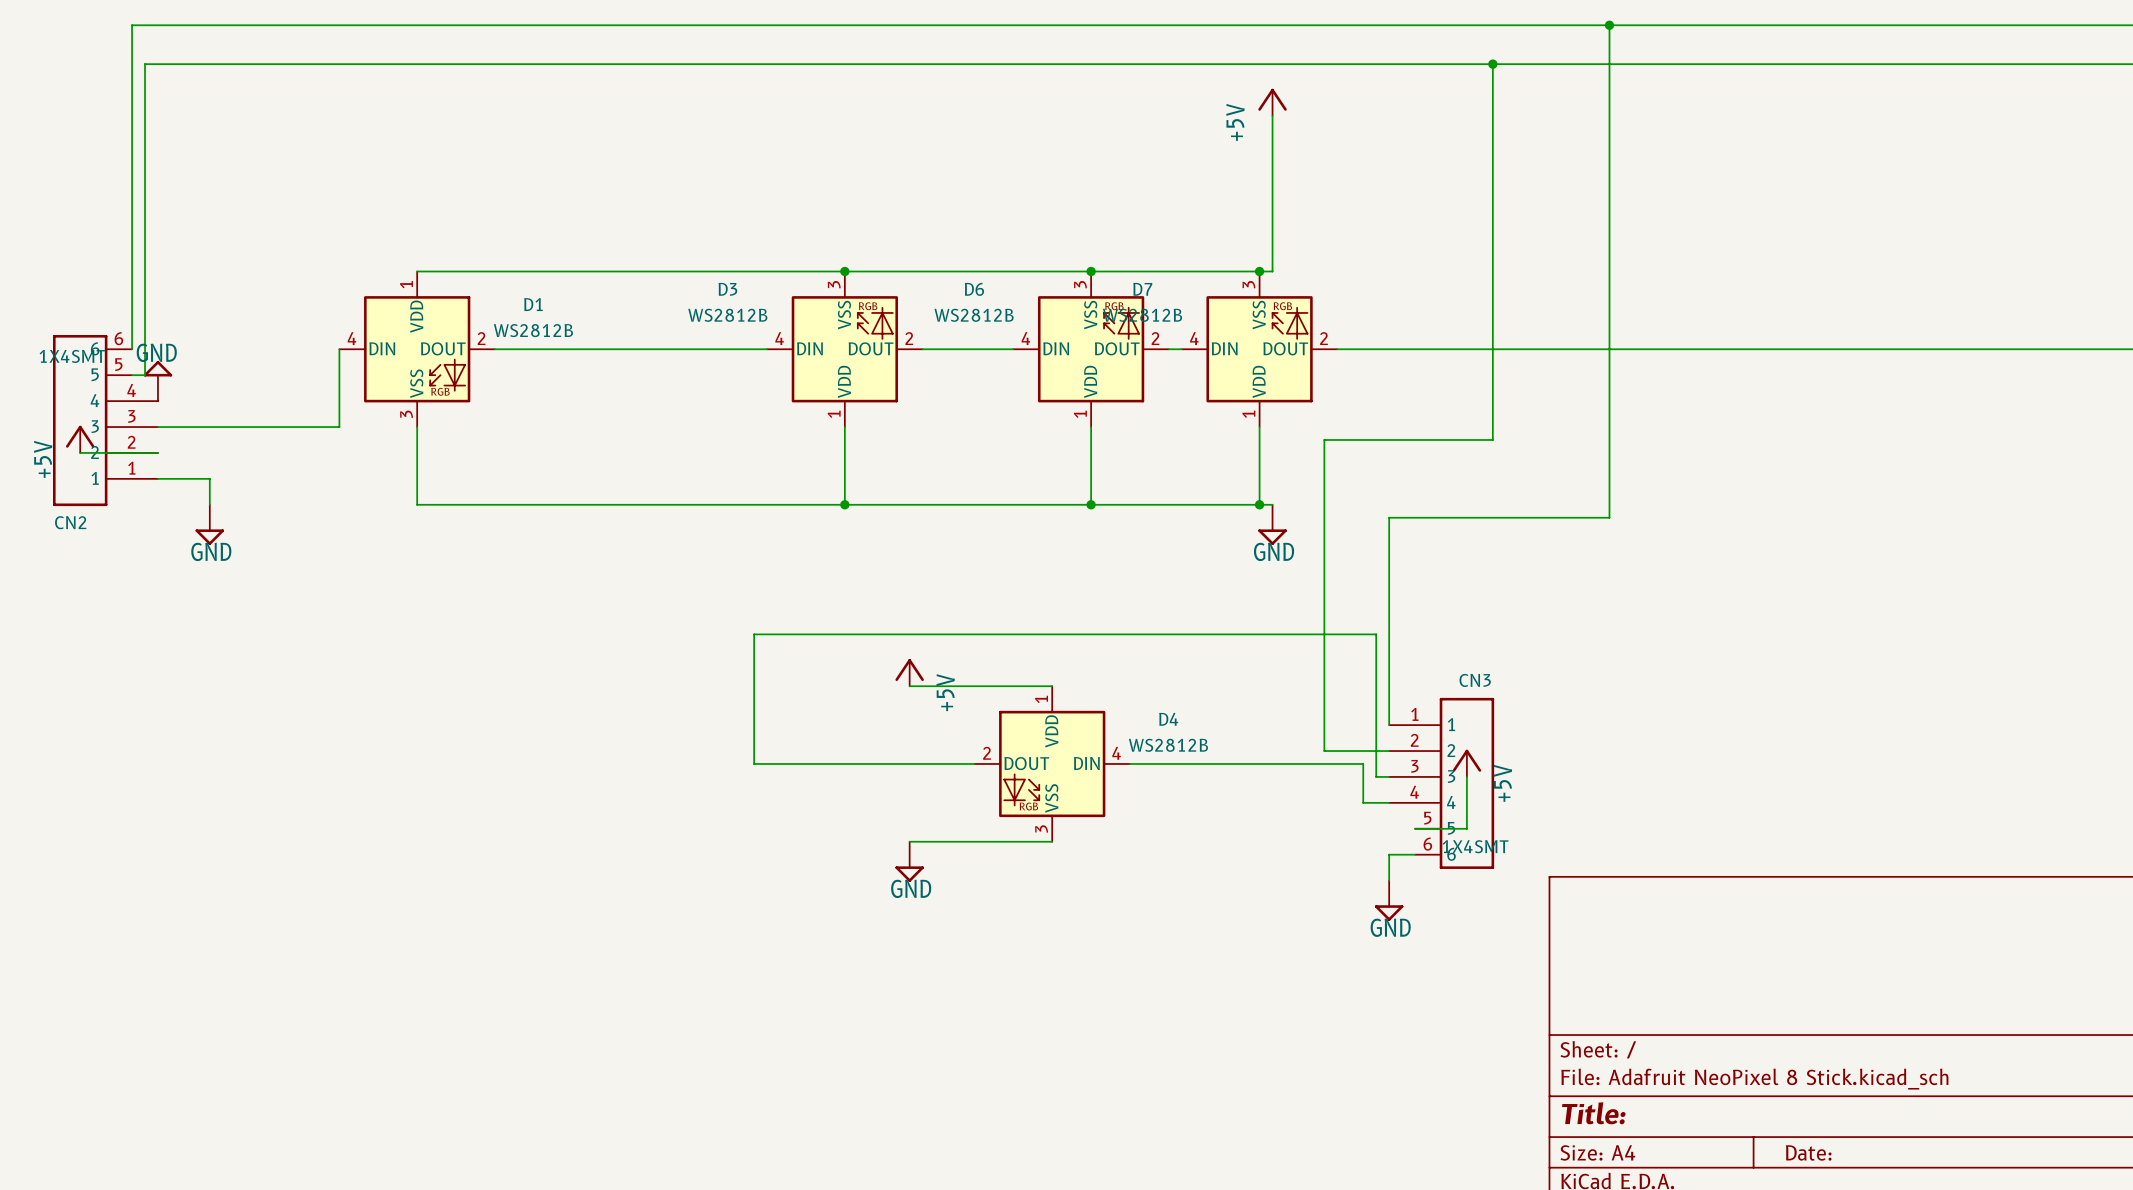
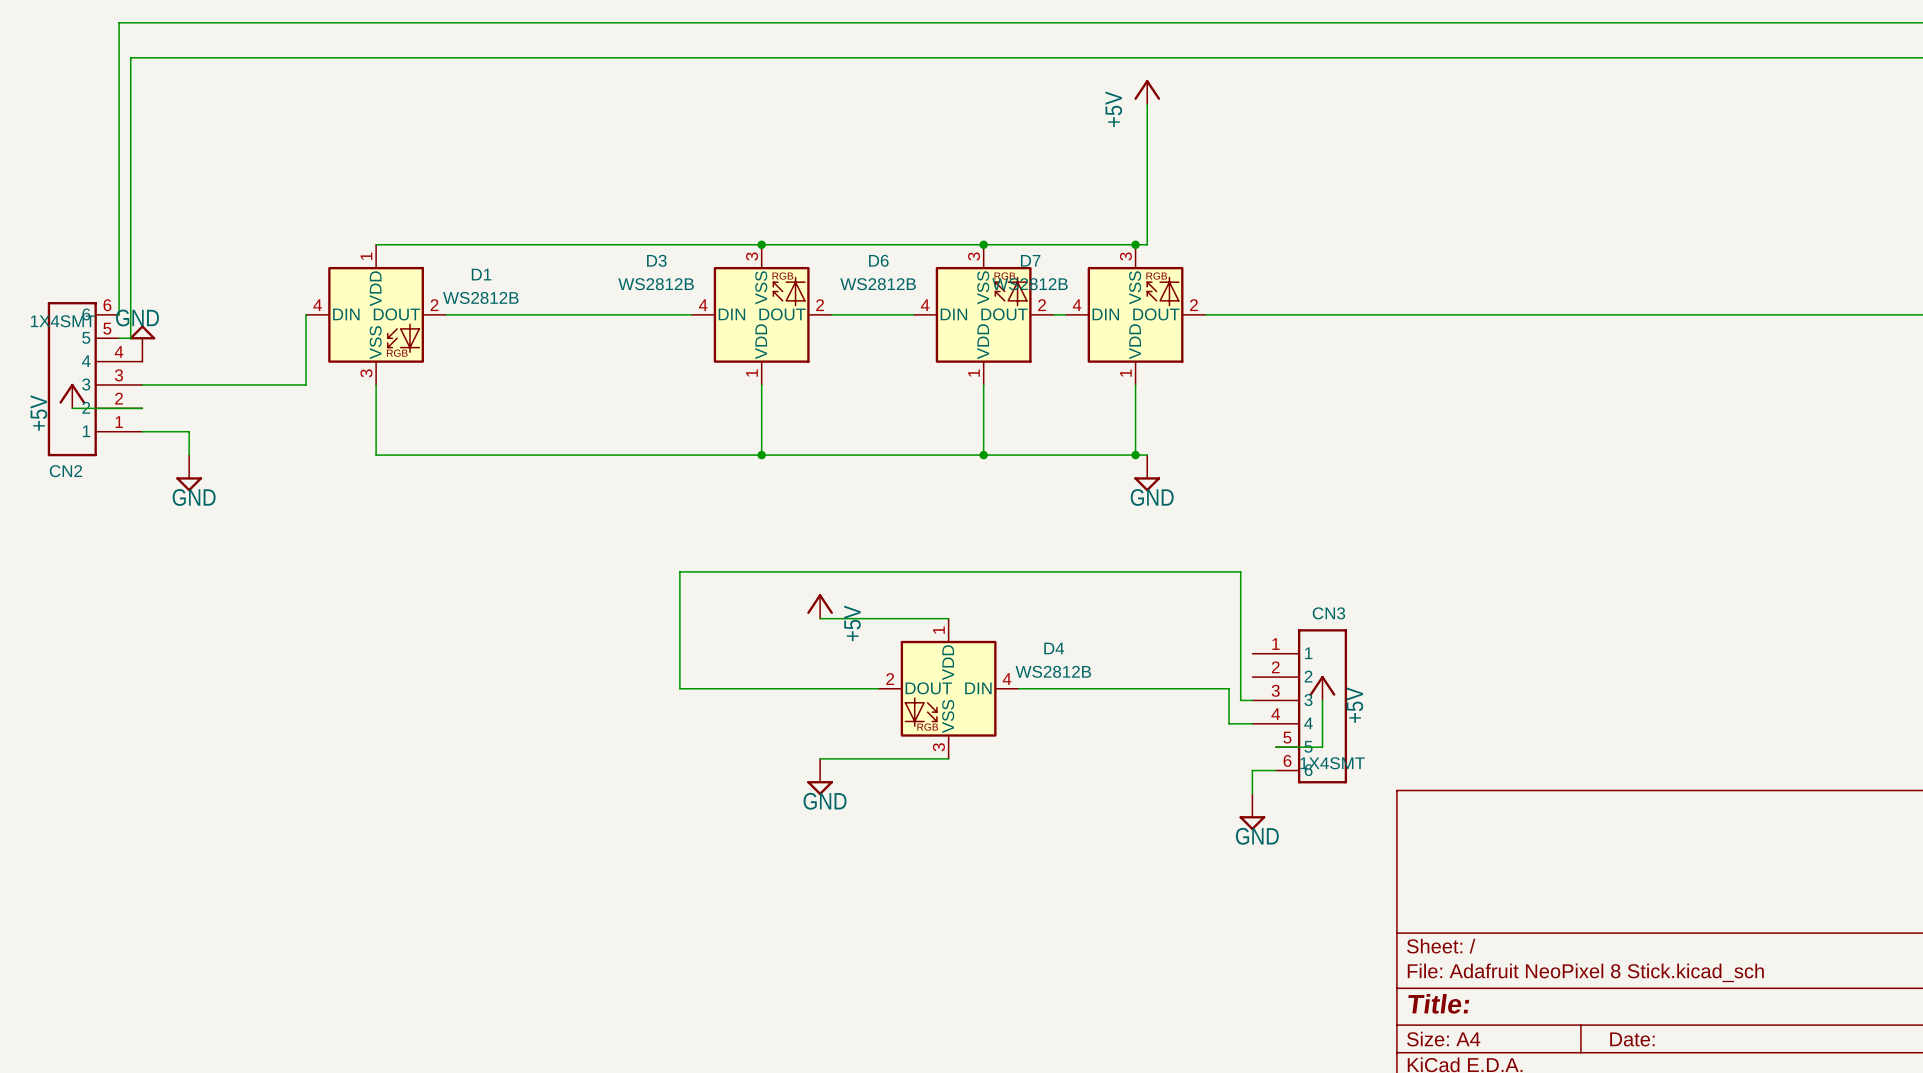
wire: (1609, 25) (1609, 517) (1389, 517) (1389, 725) -> none
junction: (1609, 25) -> none
wire: (1492, 64) (1492, 439) (1324, 439) (1324, 751) (1389, 751) -> none
junction: (1492, 64) -> none

